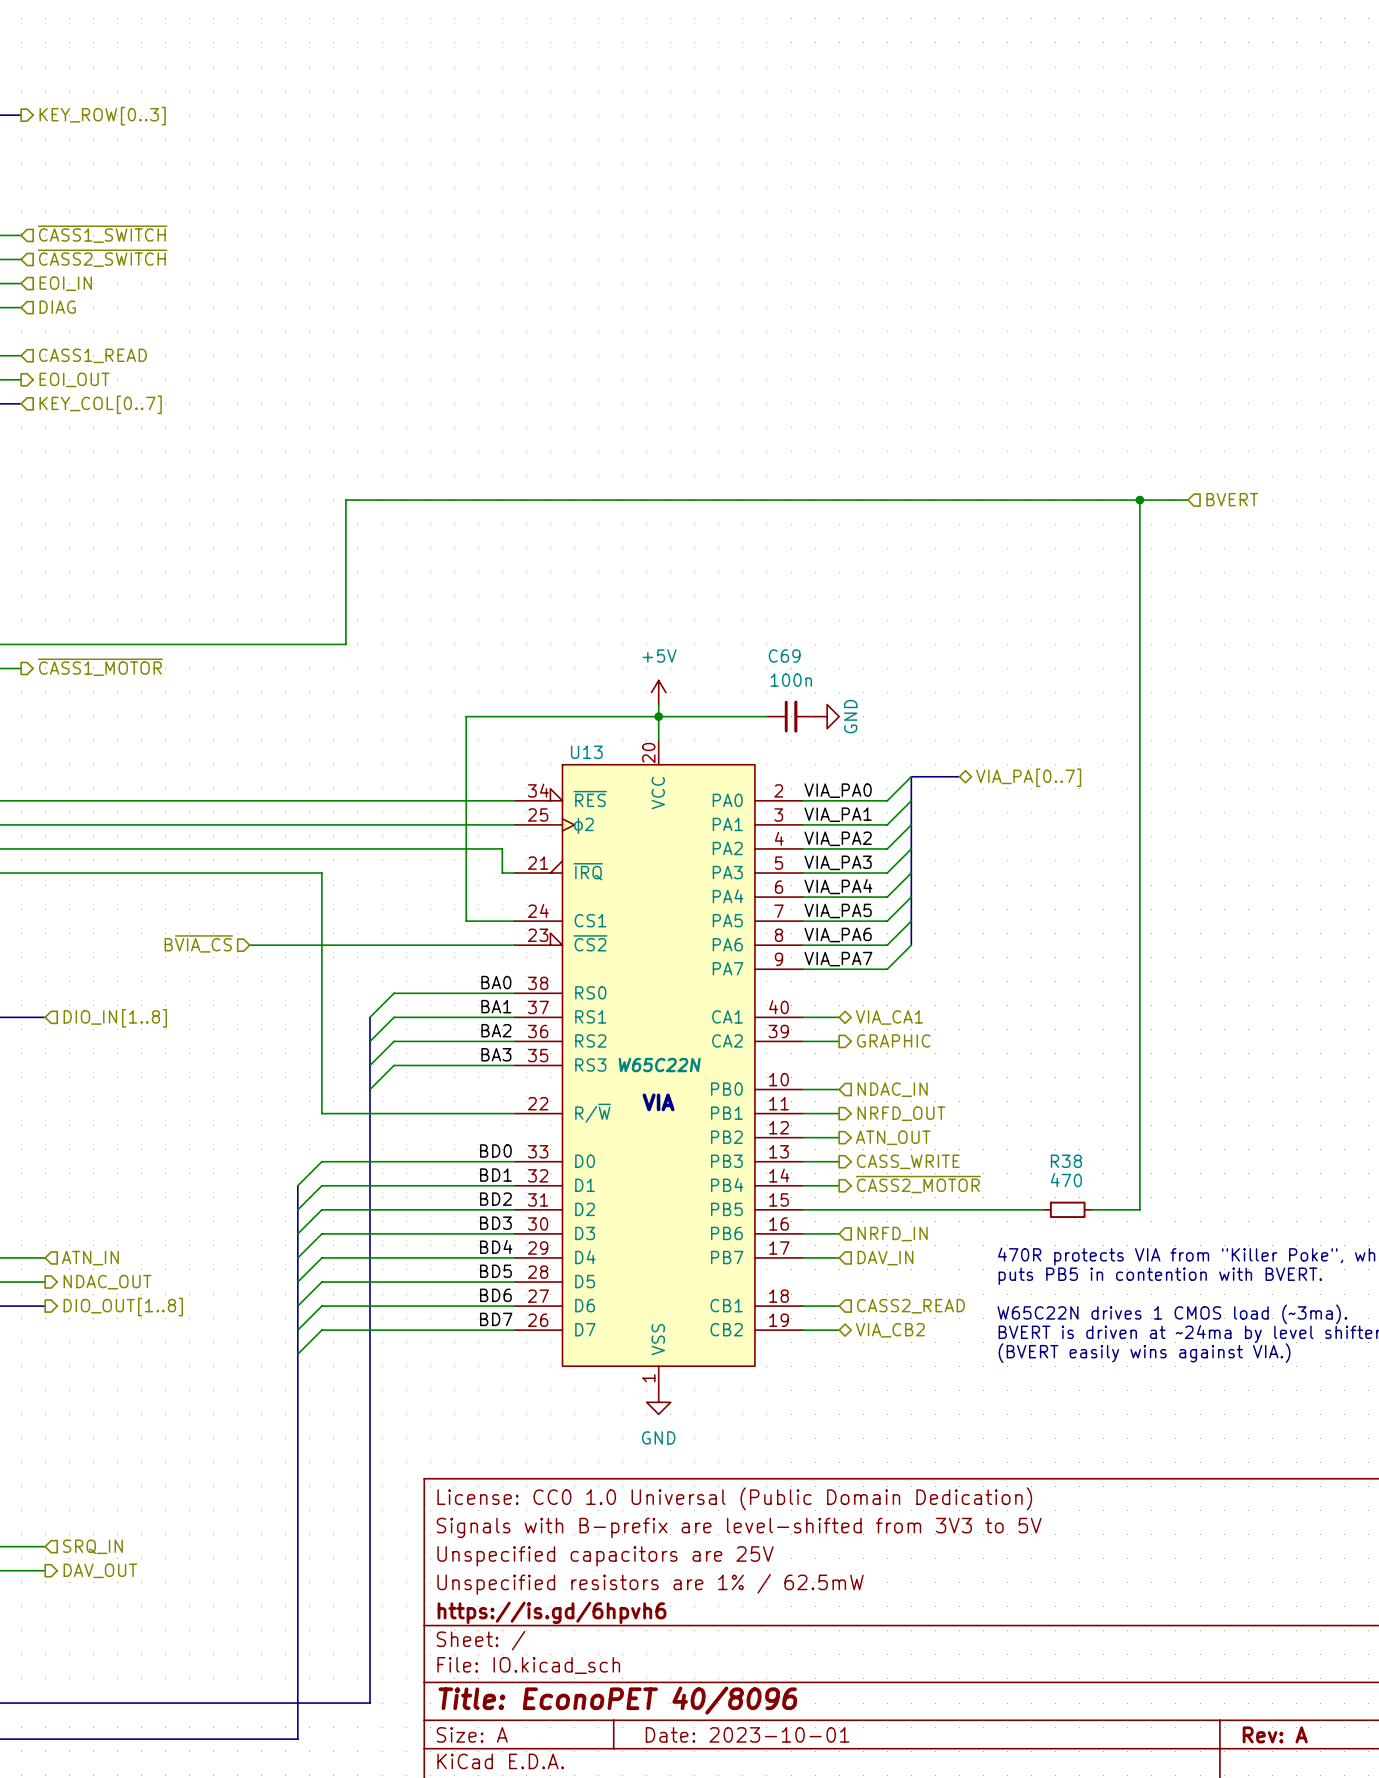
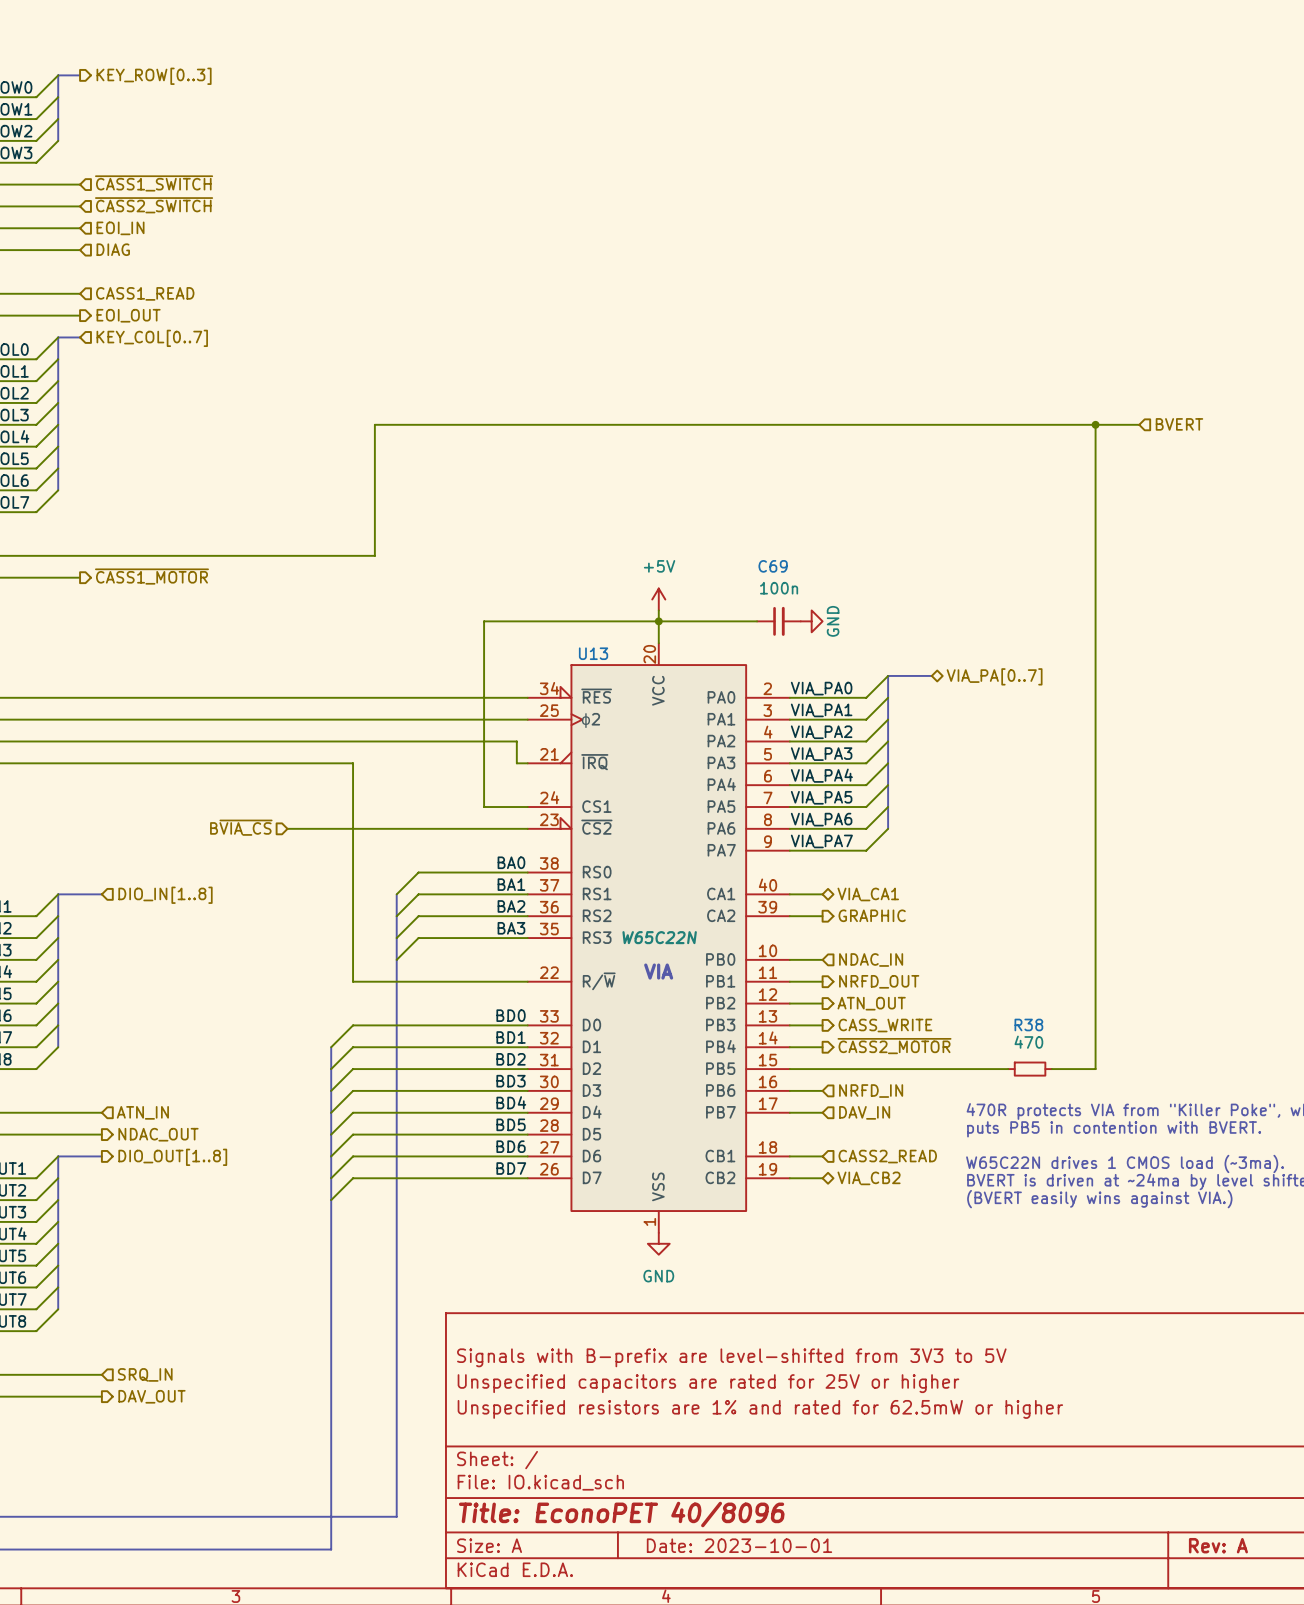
title block: License: CC0 1.0 Universal (Public Domain Dedication) (734, 1498) -> none
title block: Unspecified capacitors are 25V (605, 1556) -> Unspecified capacitors are rated for 25V or higher (708, 1383)
title block: Unspecified resistors are 1% / 62.5mW (650, 1584) -> Unspecified resistors are 1% and rated for 62.5mW or higher (760, 1409)
title block: https://is.gd/6hpvh6 (551, 1612) -> none

